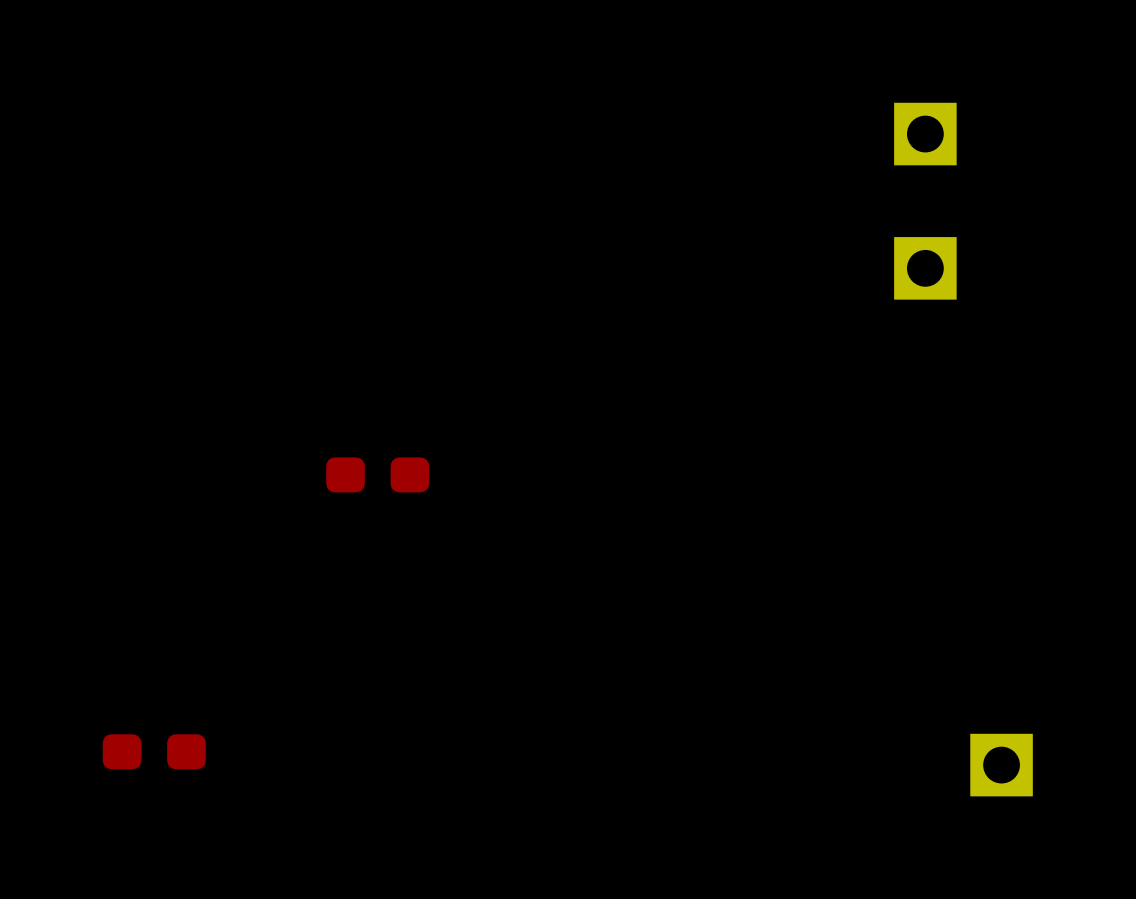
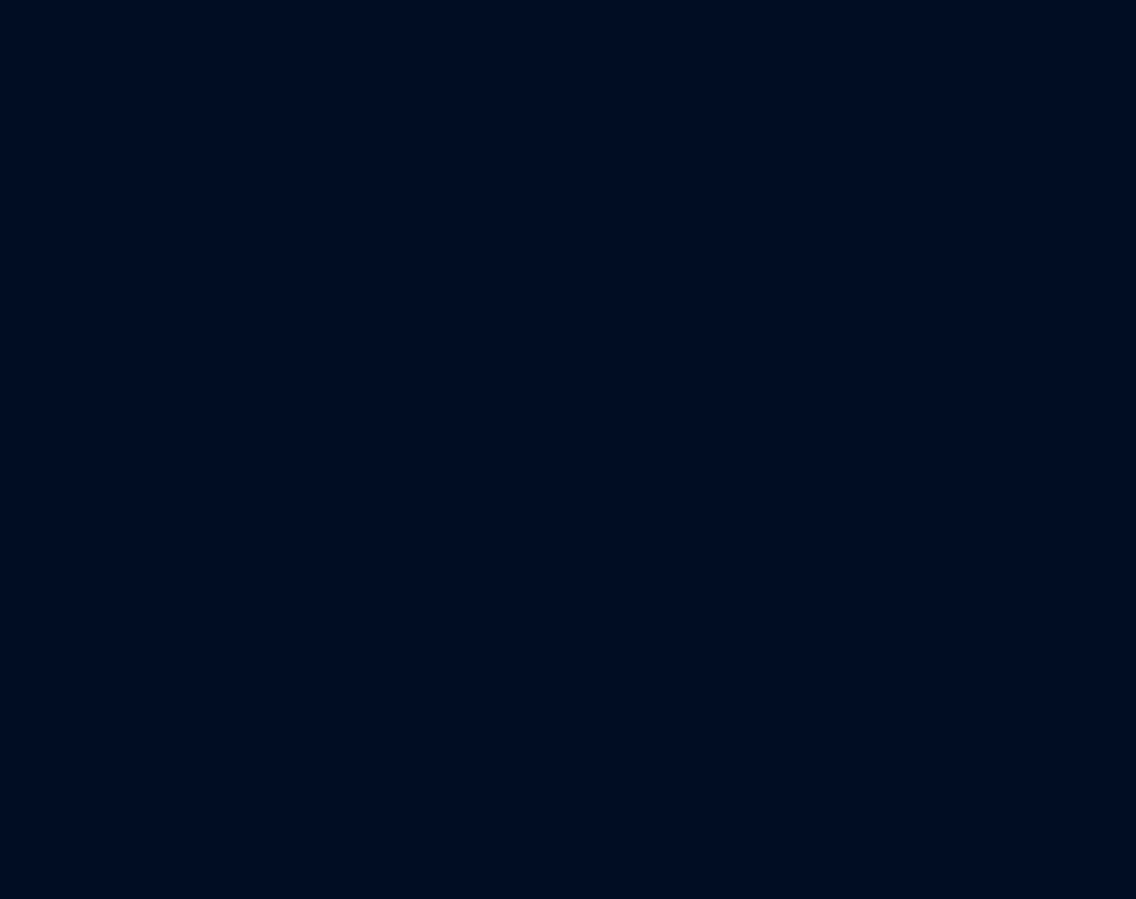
part: (925, 134) -> none
part: (925, 268) -> none
part: (377, 474) -> none
part: (154, 751) -> none
part: (1001, 765) -> none

